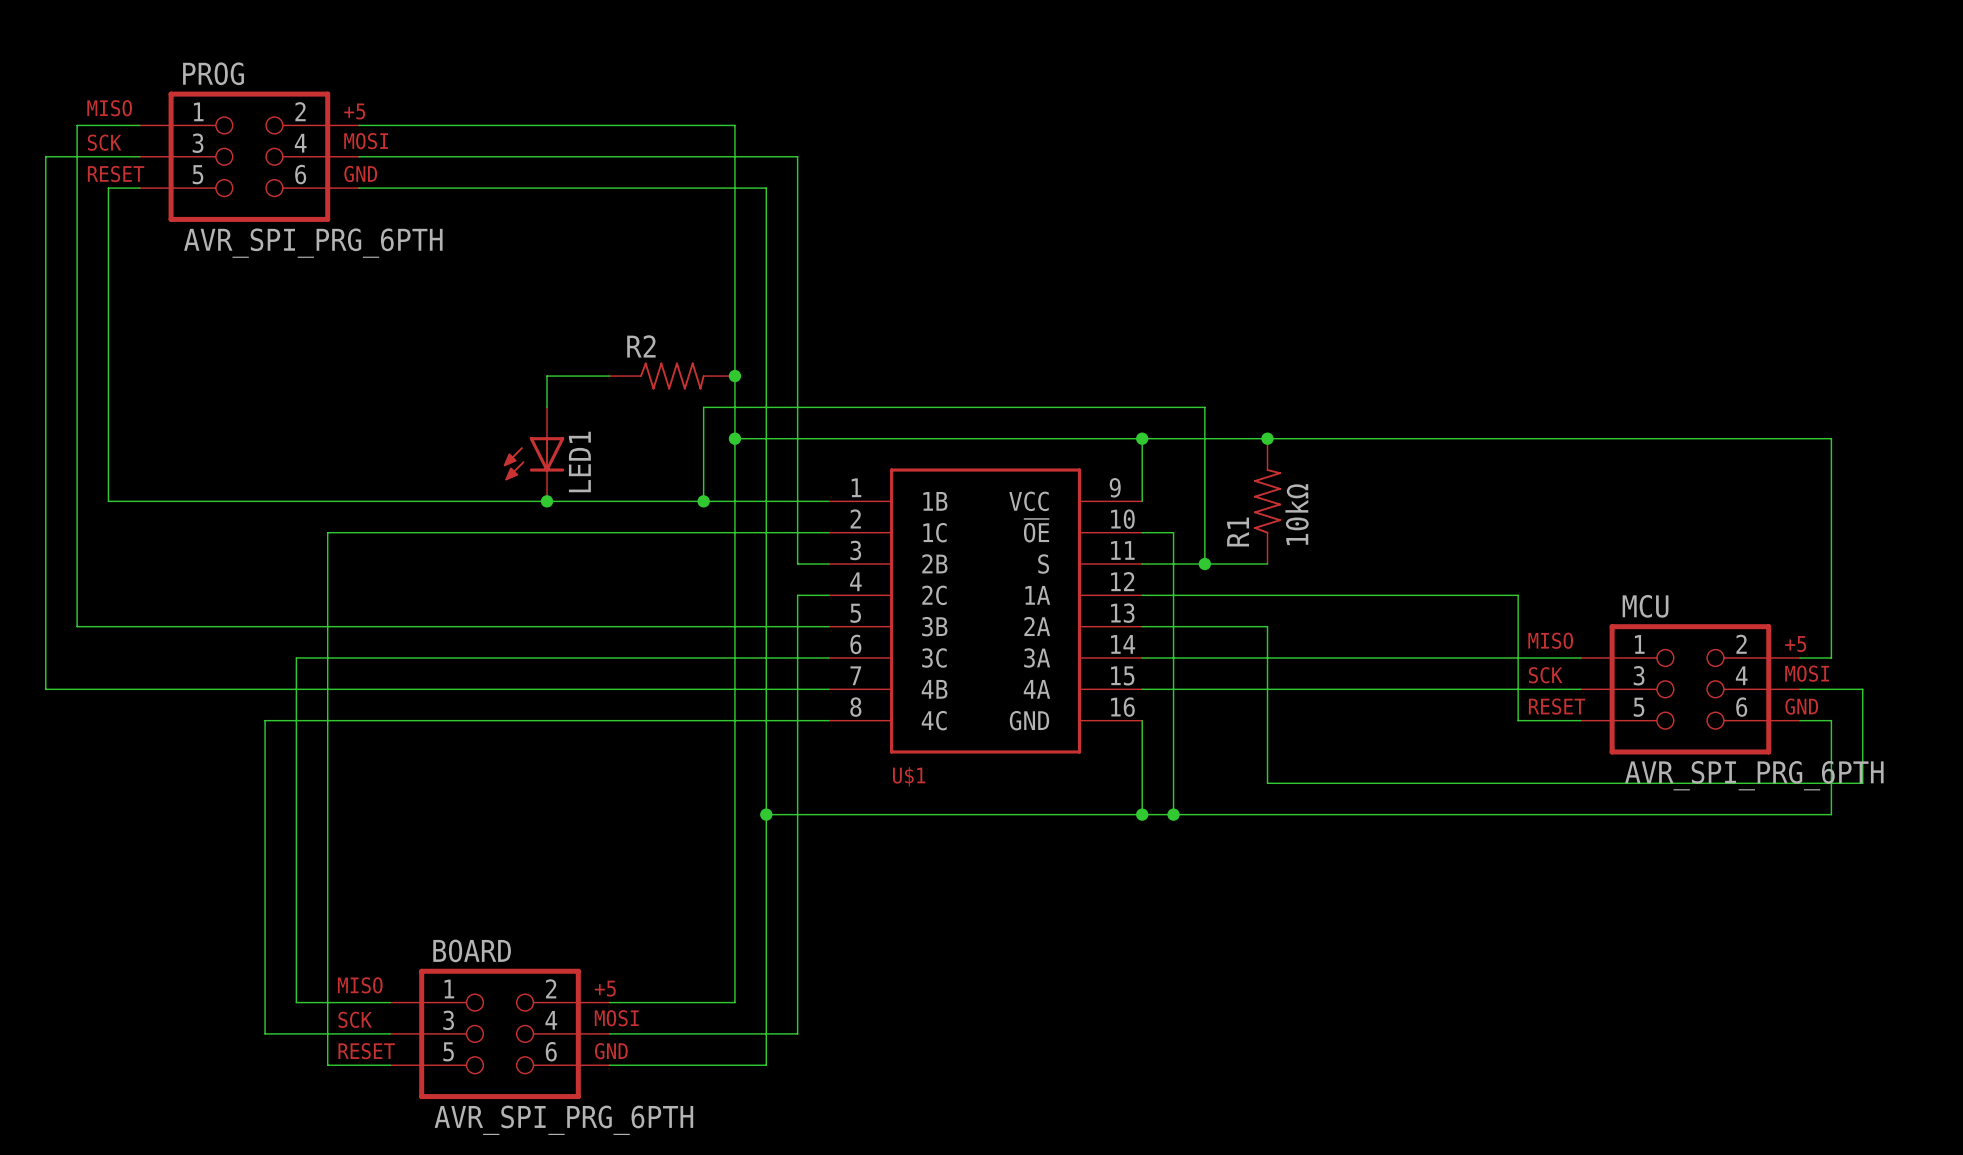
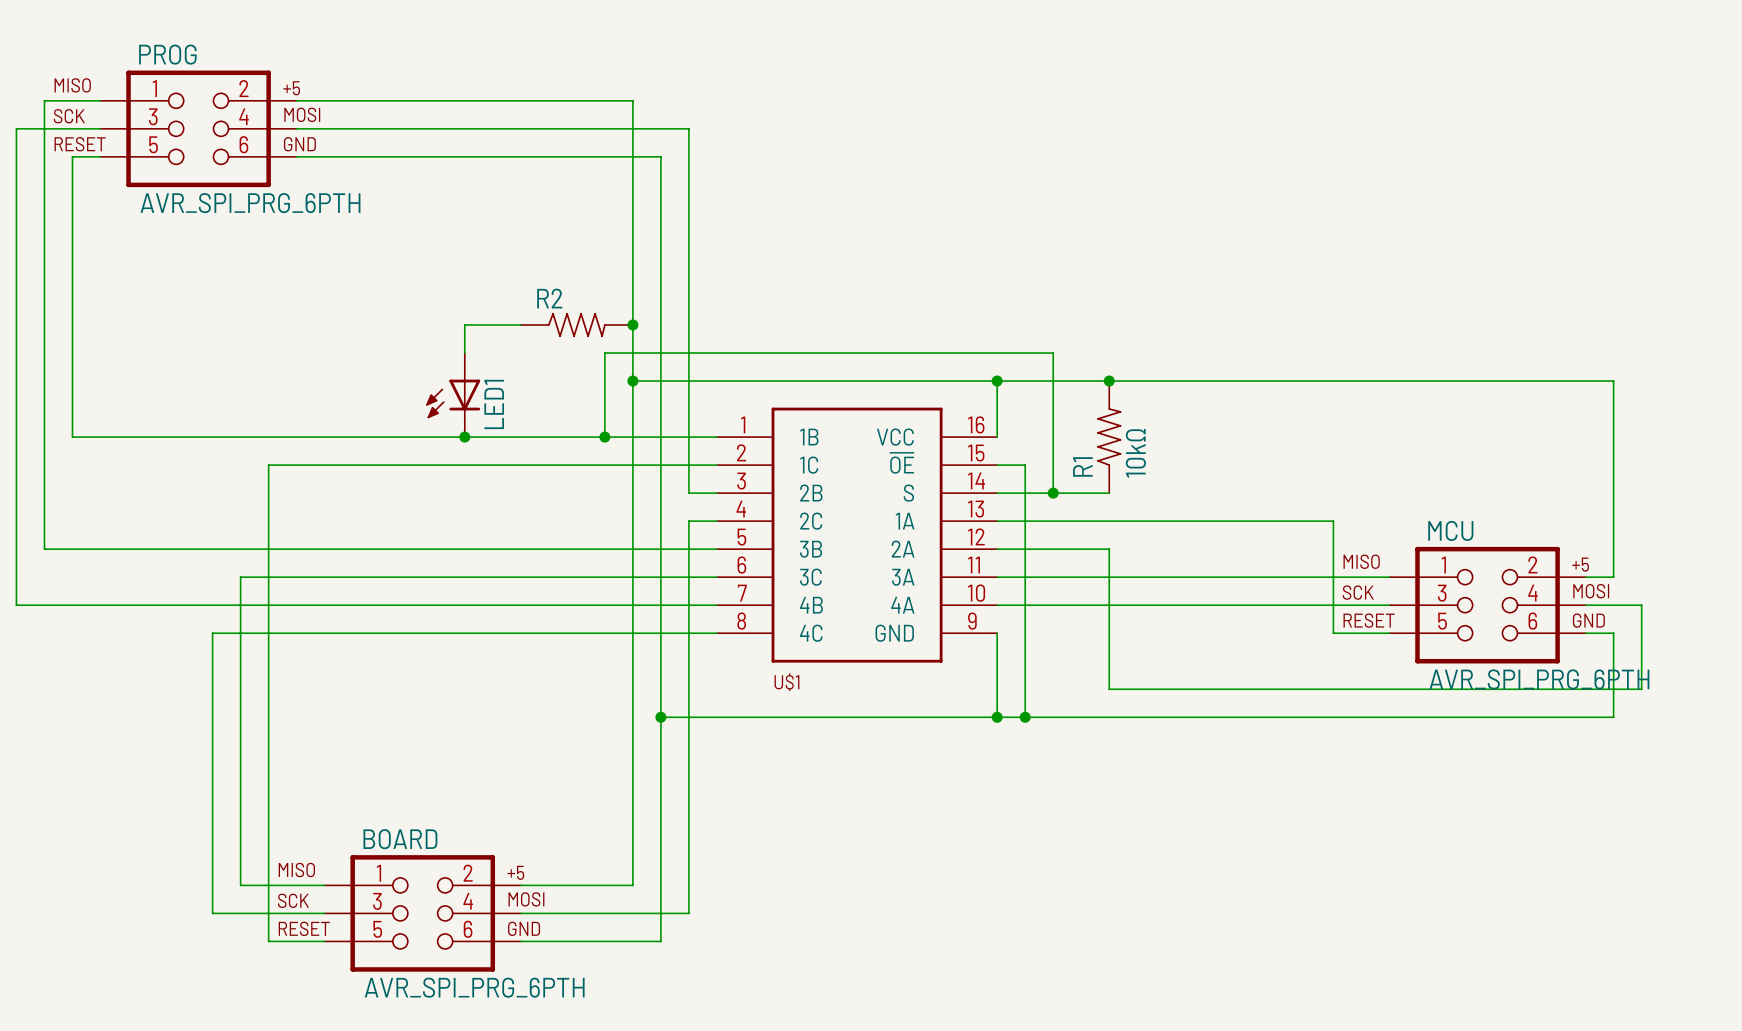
U$1 pin number: 9 (1115, 487) -> 16 (976, 424)
U$1 pin number: 10 (1122, 519) -> 15 (976, 453)
U$1 pin number: 11 (1122, 550) -> 14 (976, 480)
U$1 pin number: 12 (1122, 581) -> 13 (976, 509)
U$1 pin number: 13 (1122, 613) -> 12 (976, 536)
U$1 pin number: 14 (1123, 644) -> 11 (974, 565)
U$1 pin number: 15 (1122, 675) -> 10 (976, 593)
U$1 pin number: 16 (1122, 707) -> 9 (972, 621)

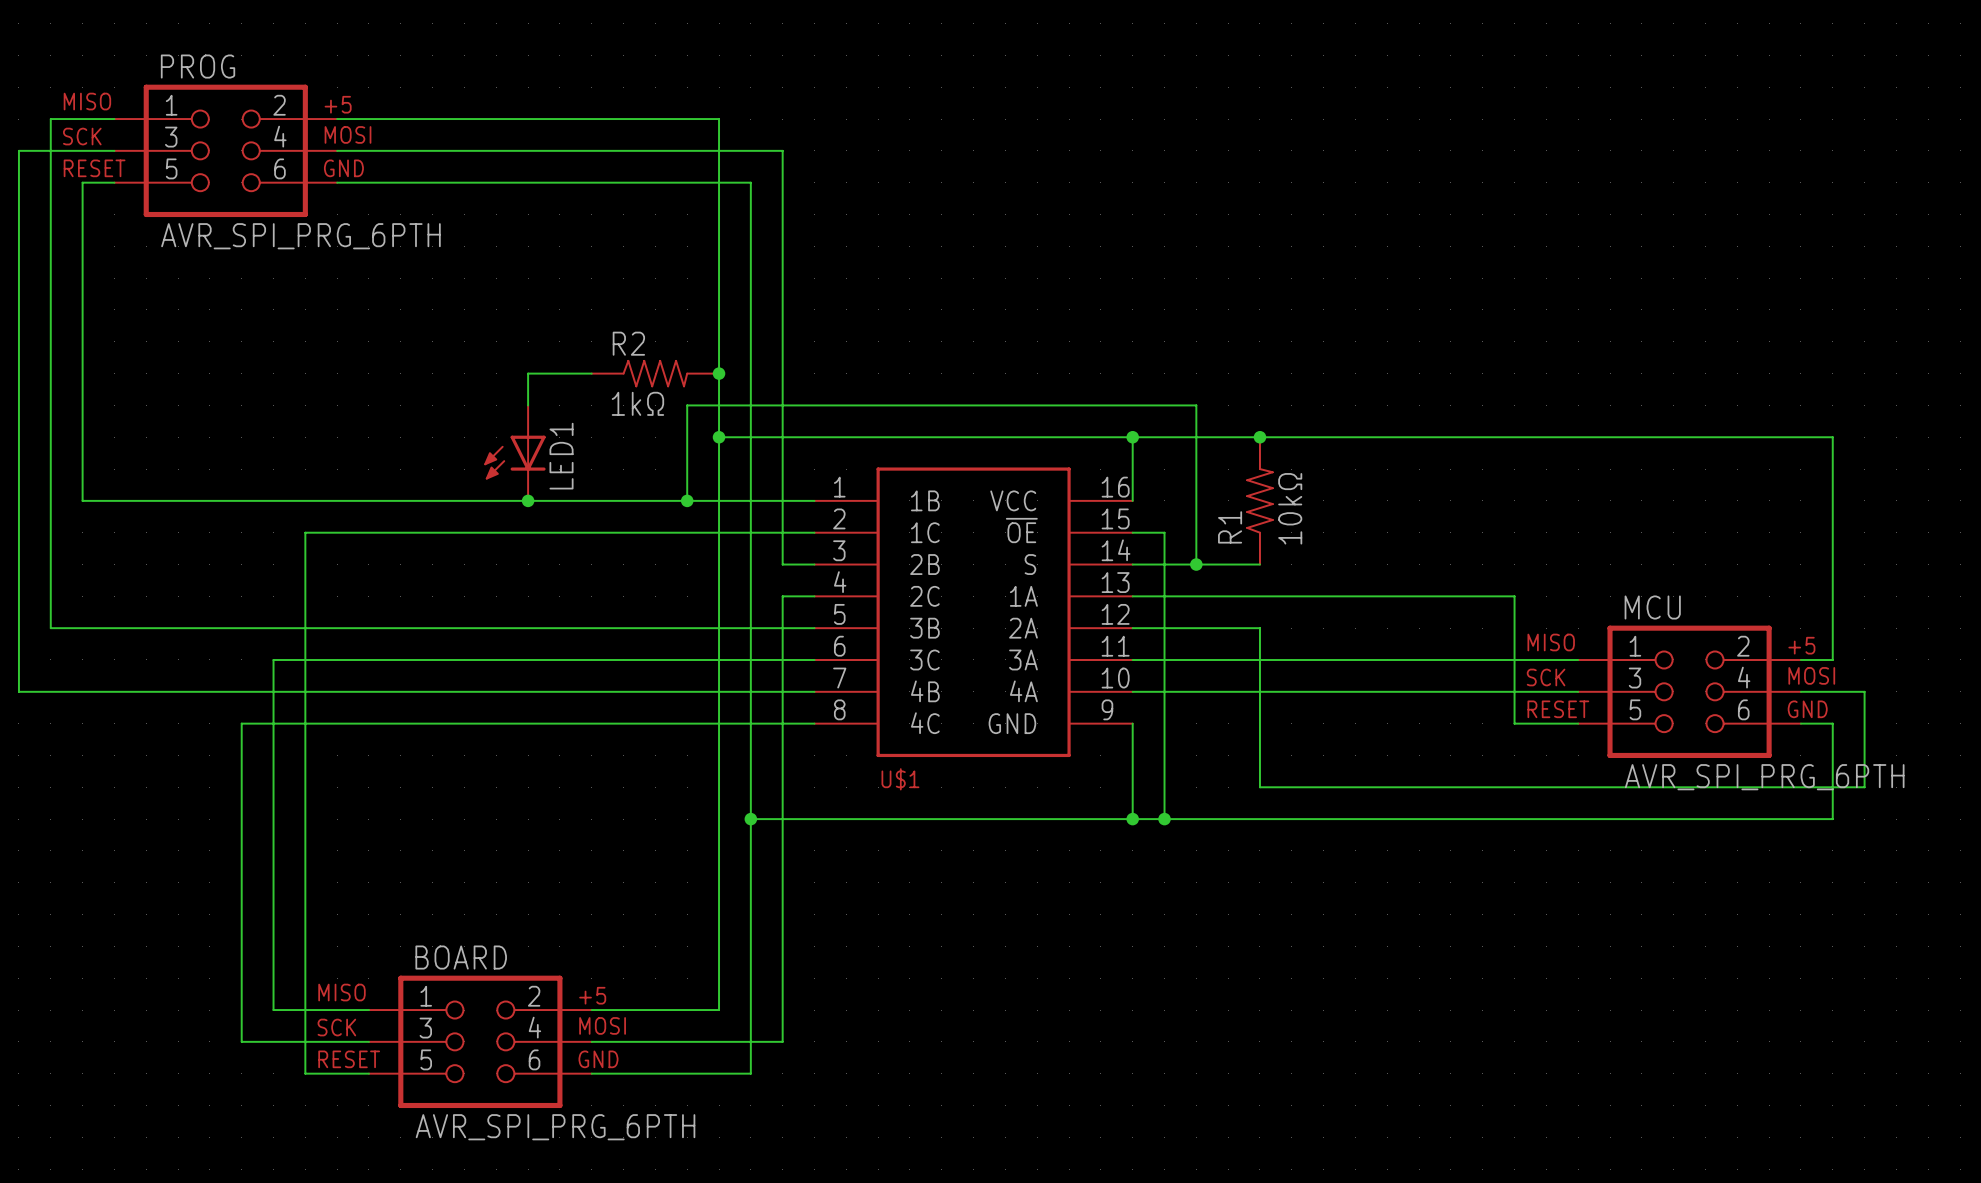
R2 value: none -> 1kΩ (637, 403)

